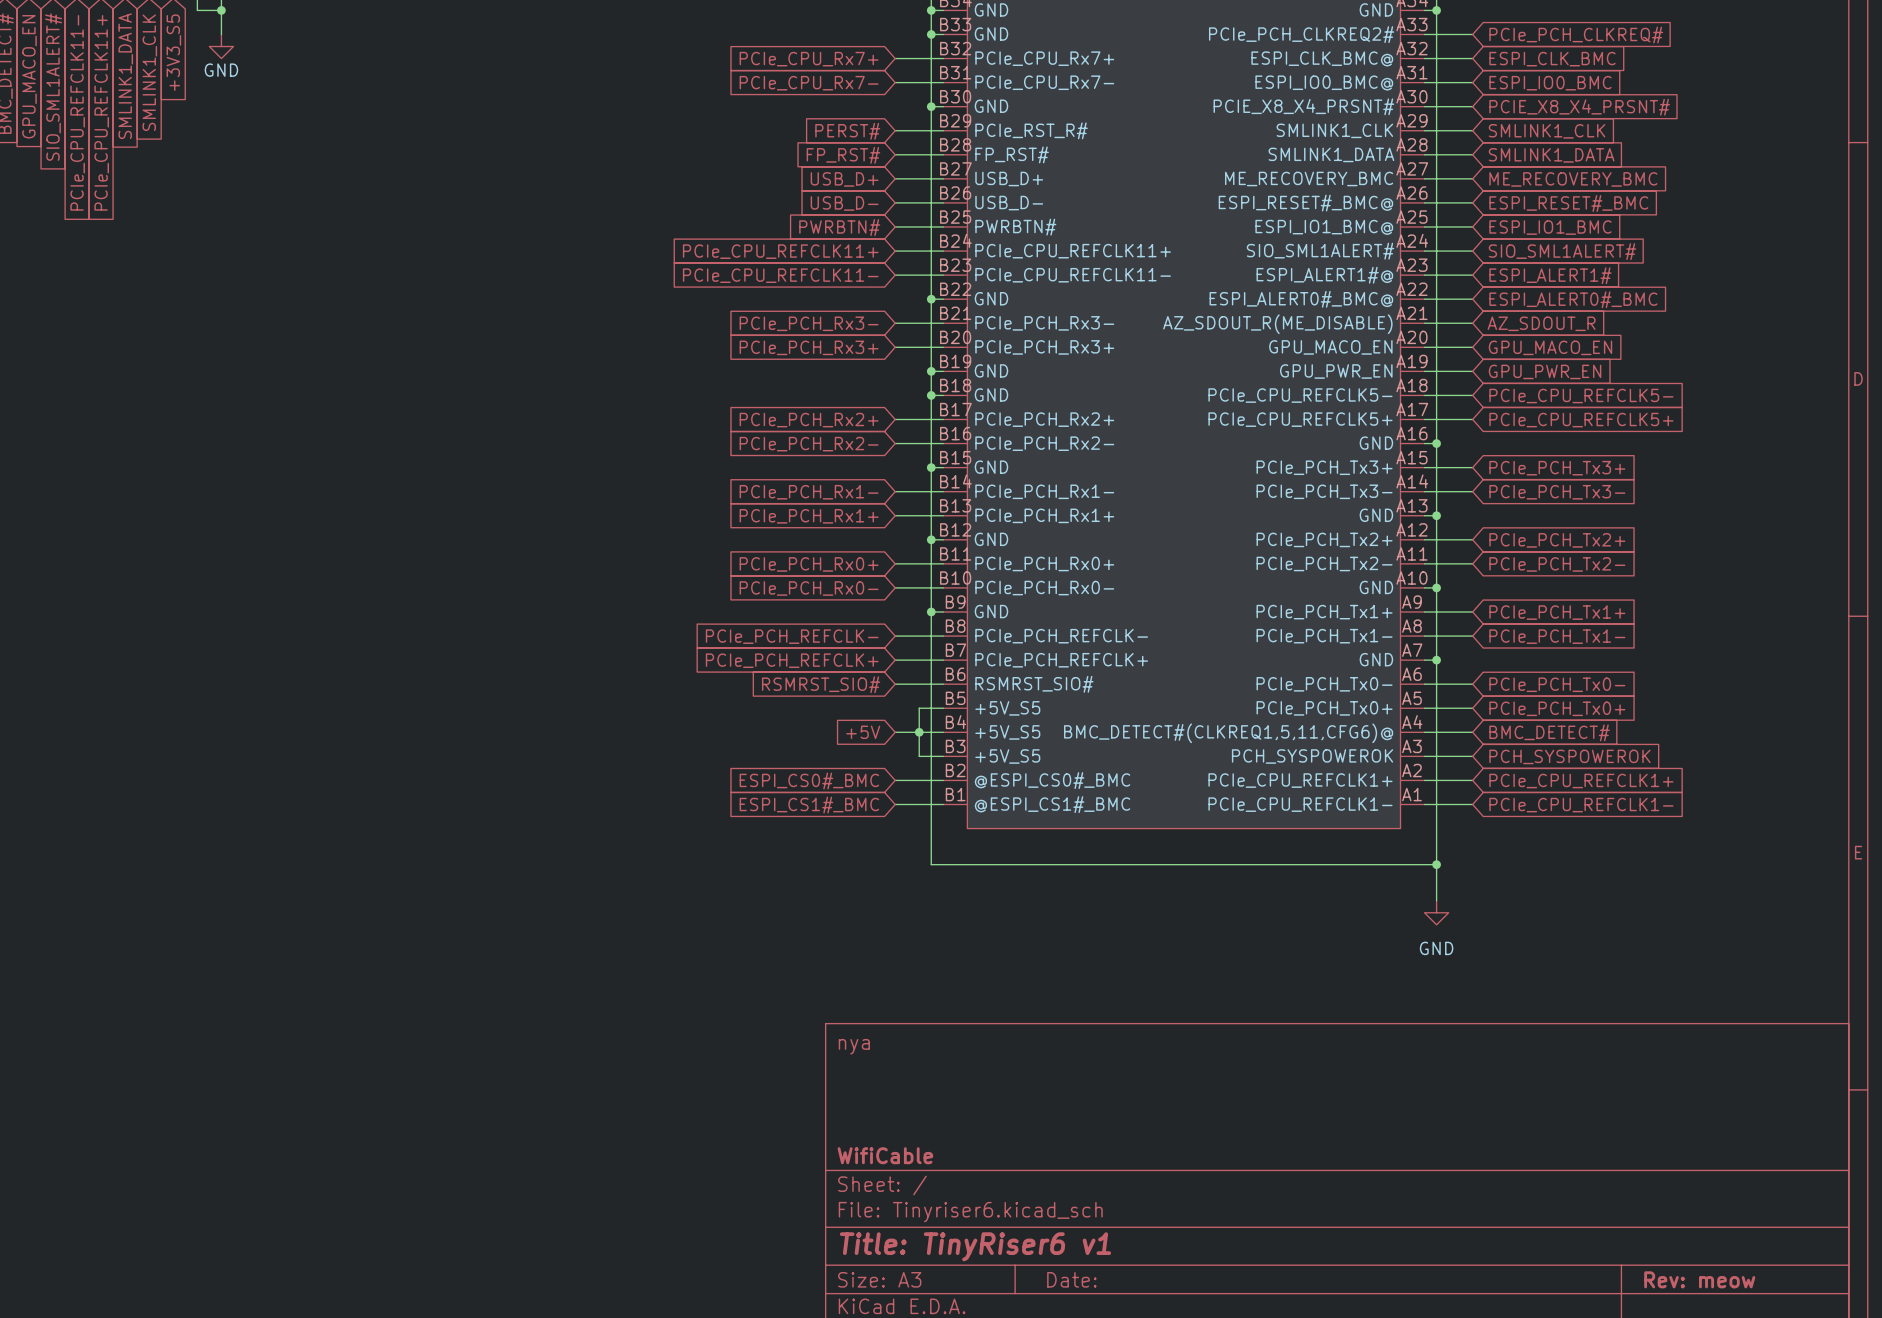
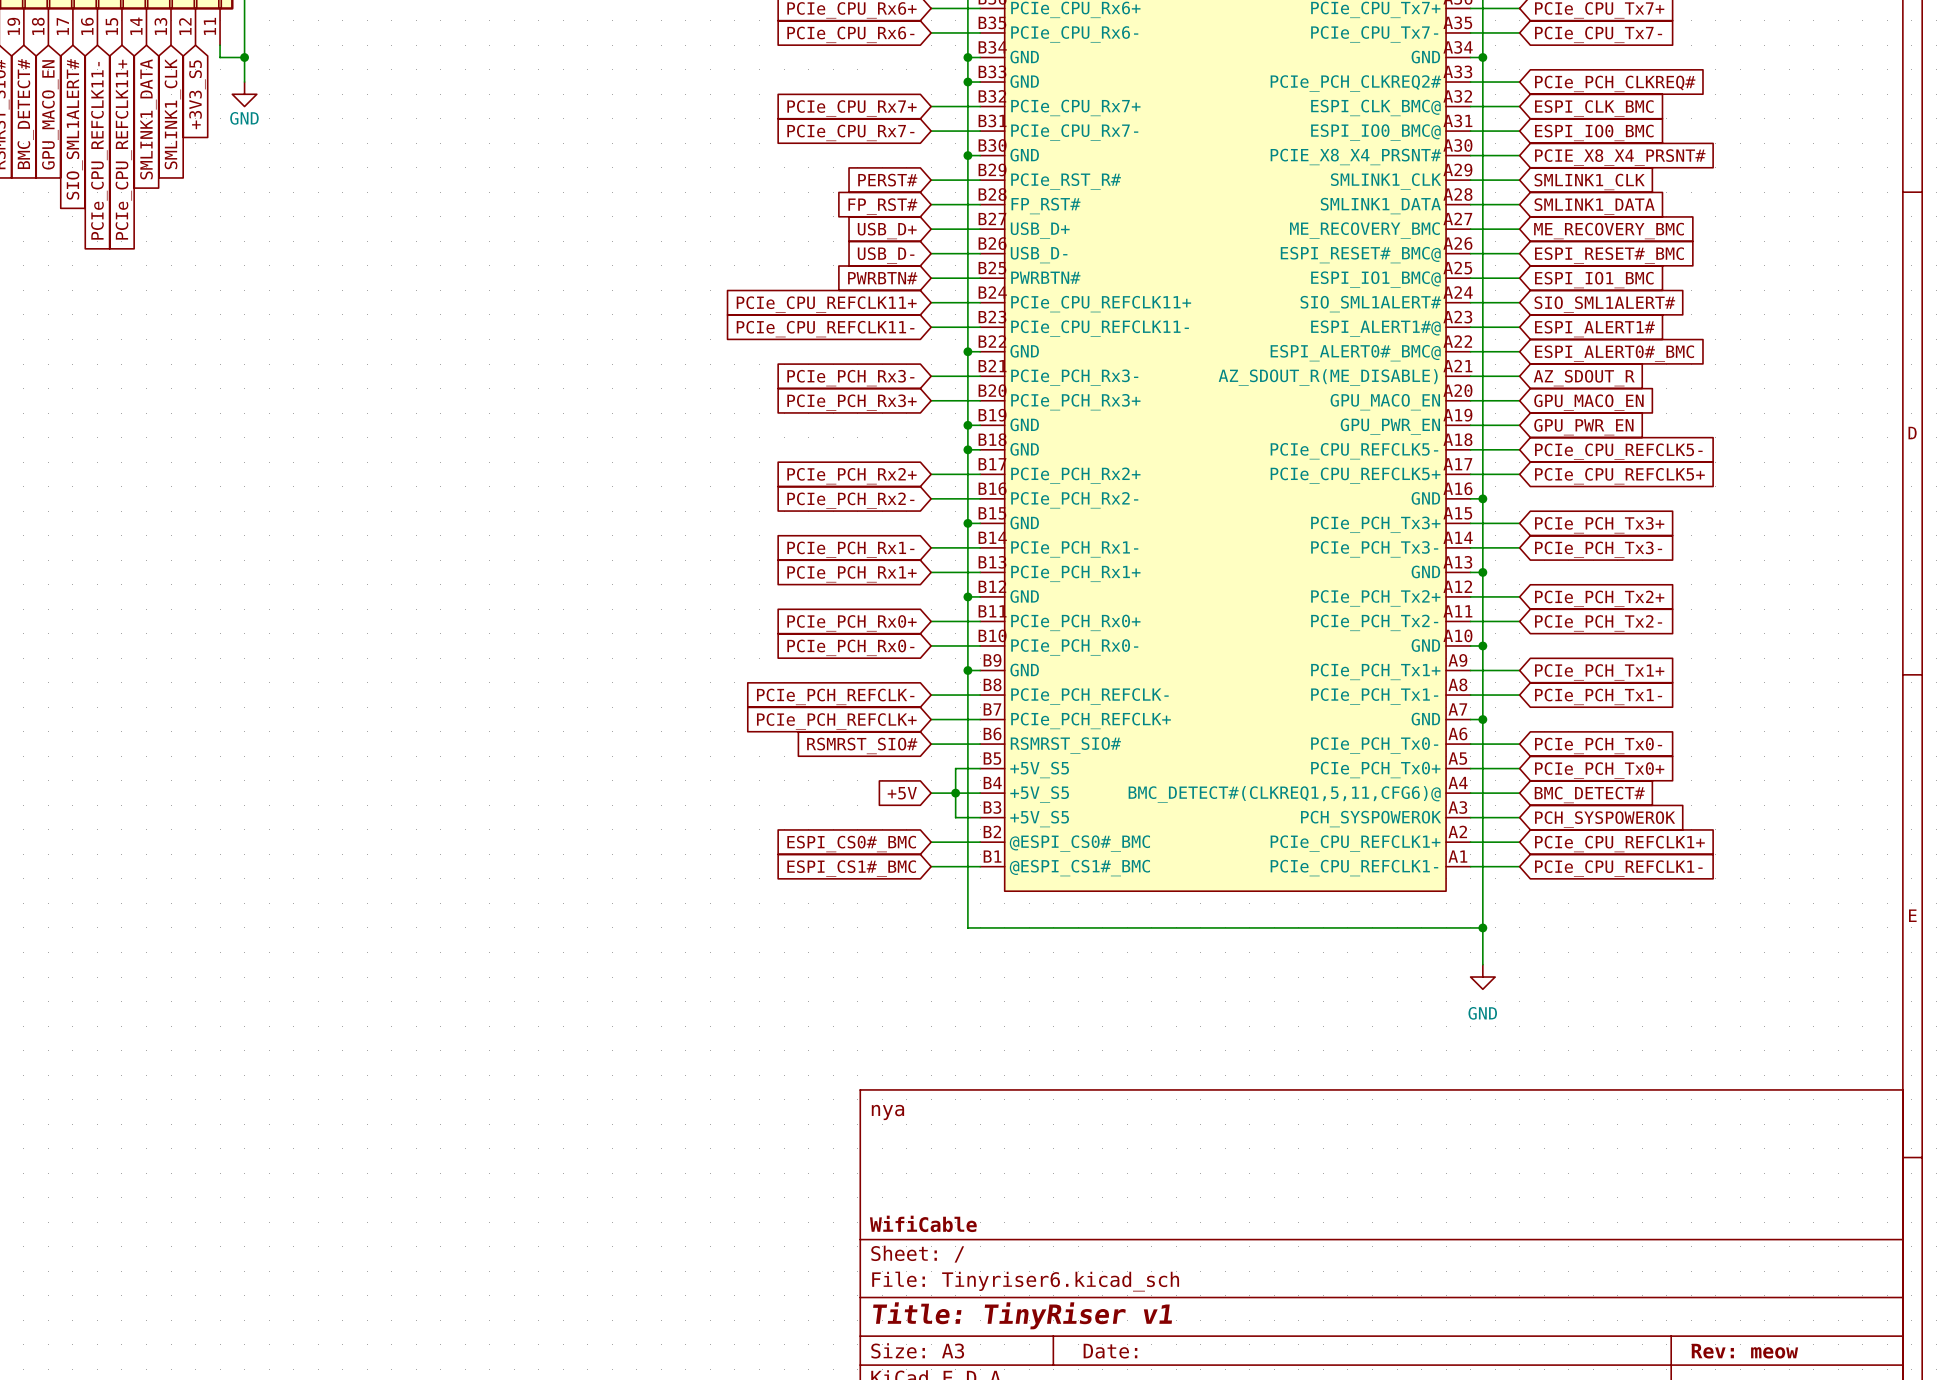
title block: Title: TinyRiser6 v1 (975, 1246) -> Title: TinyRiser v1 (1022, 1315)

